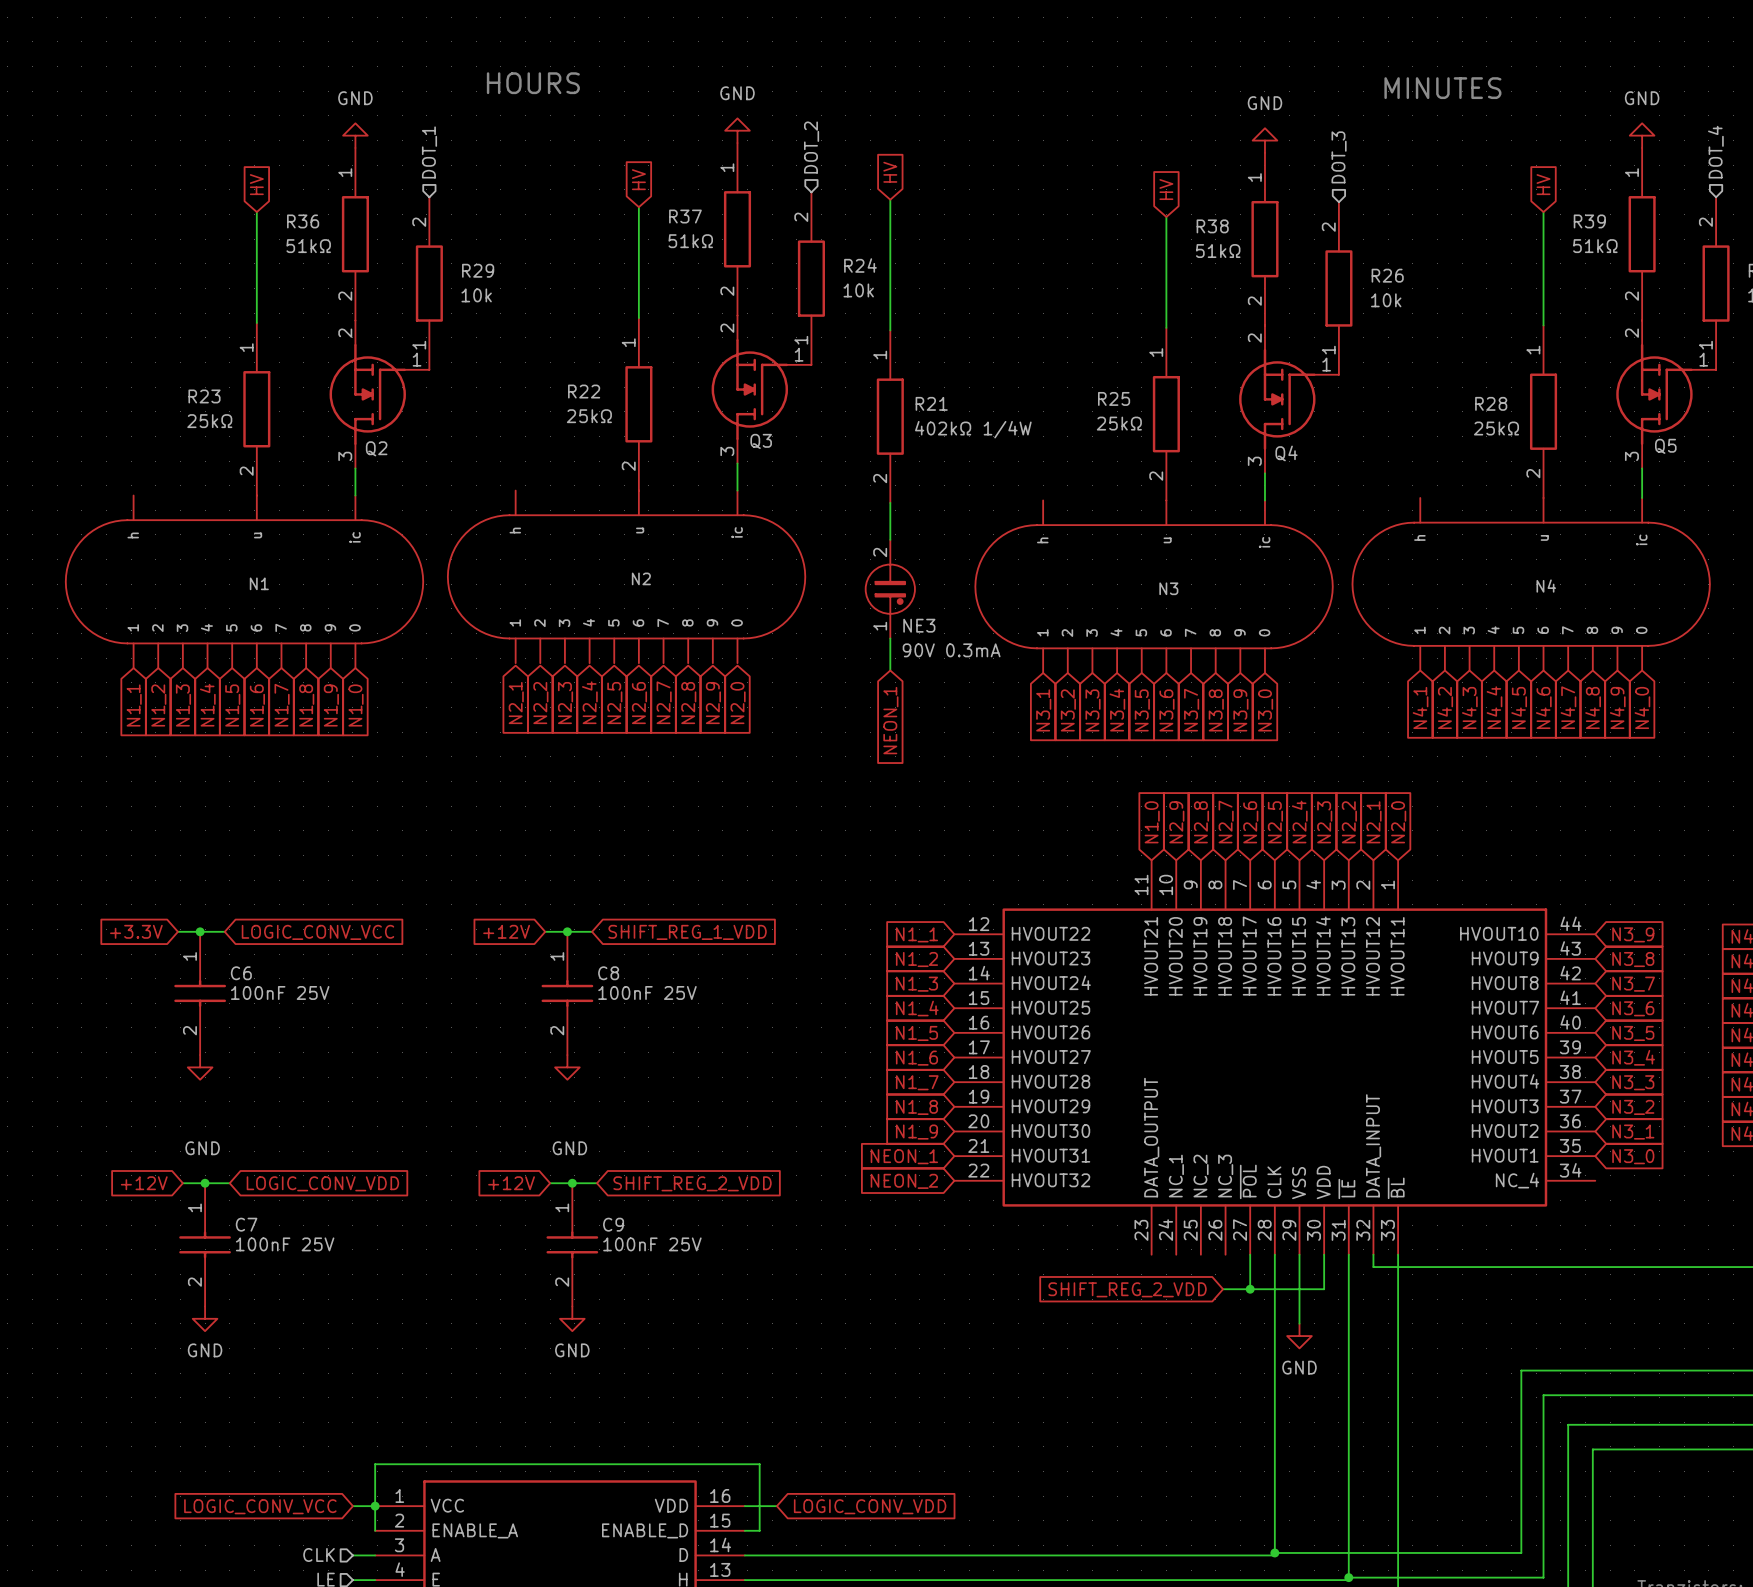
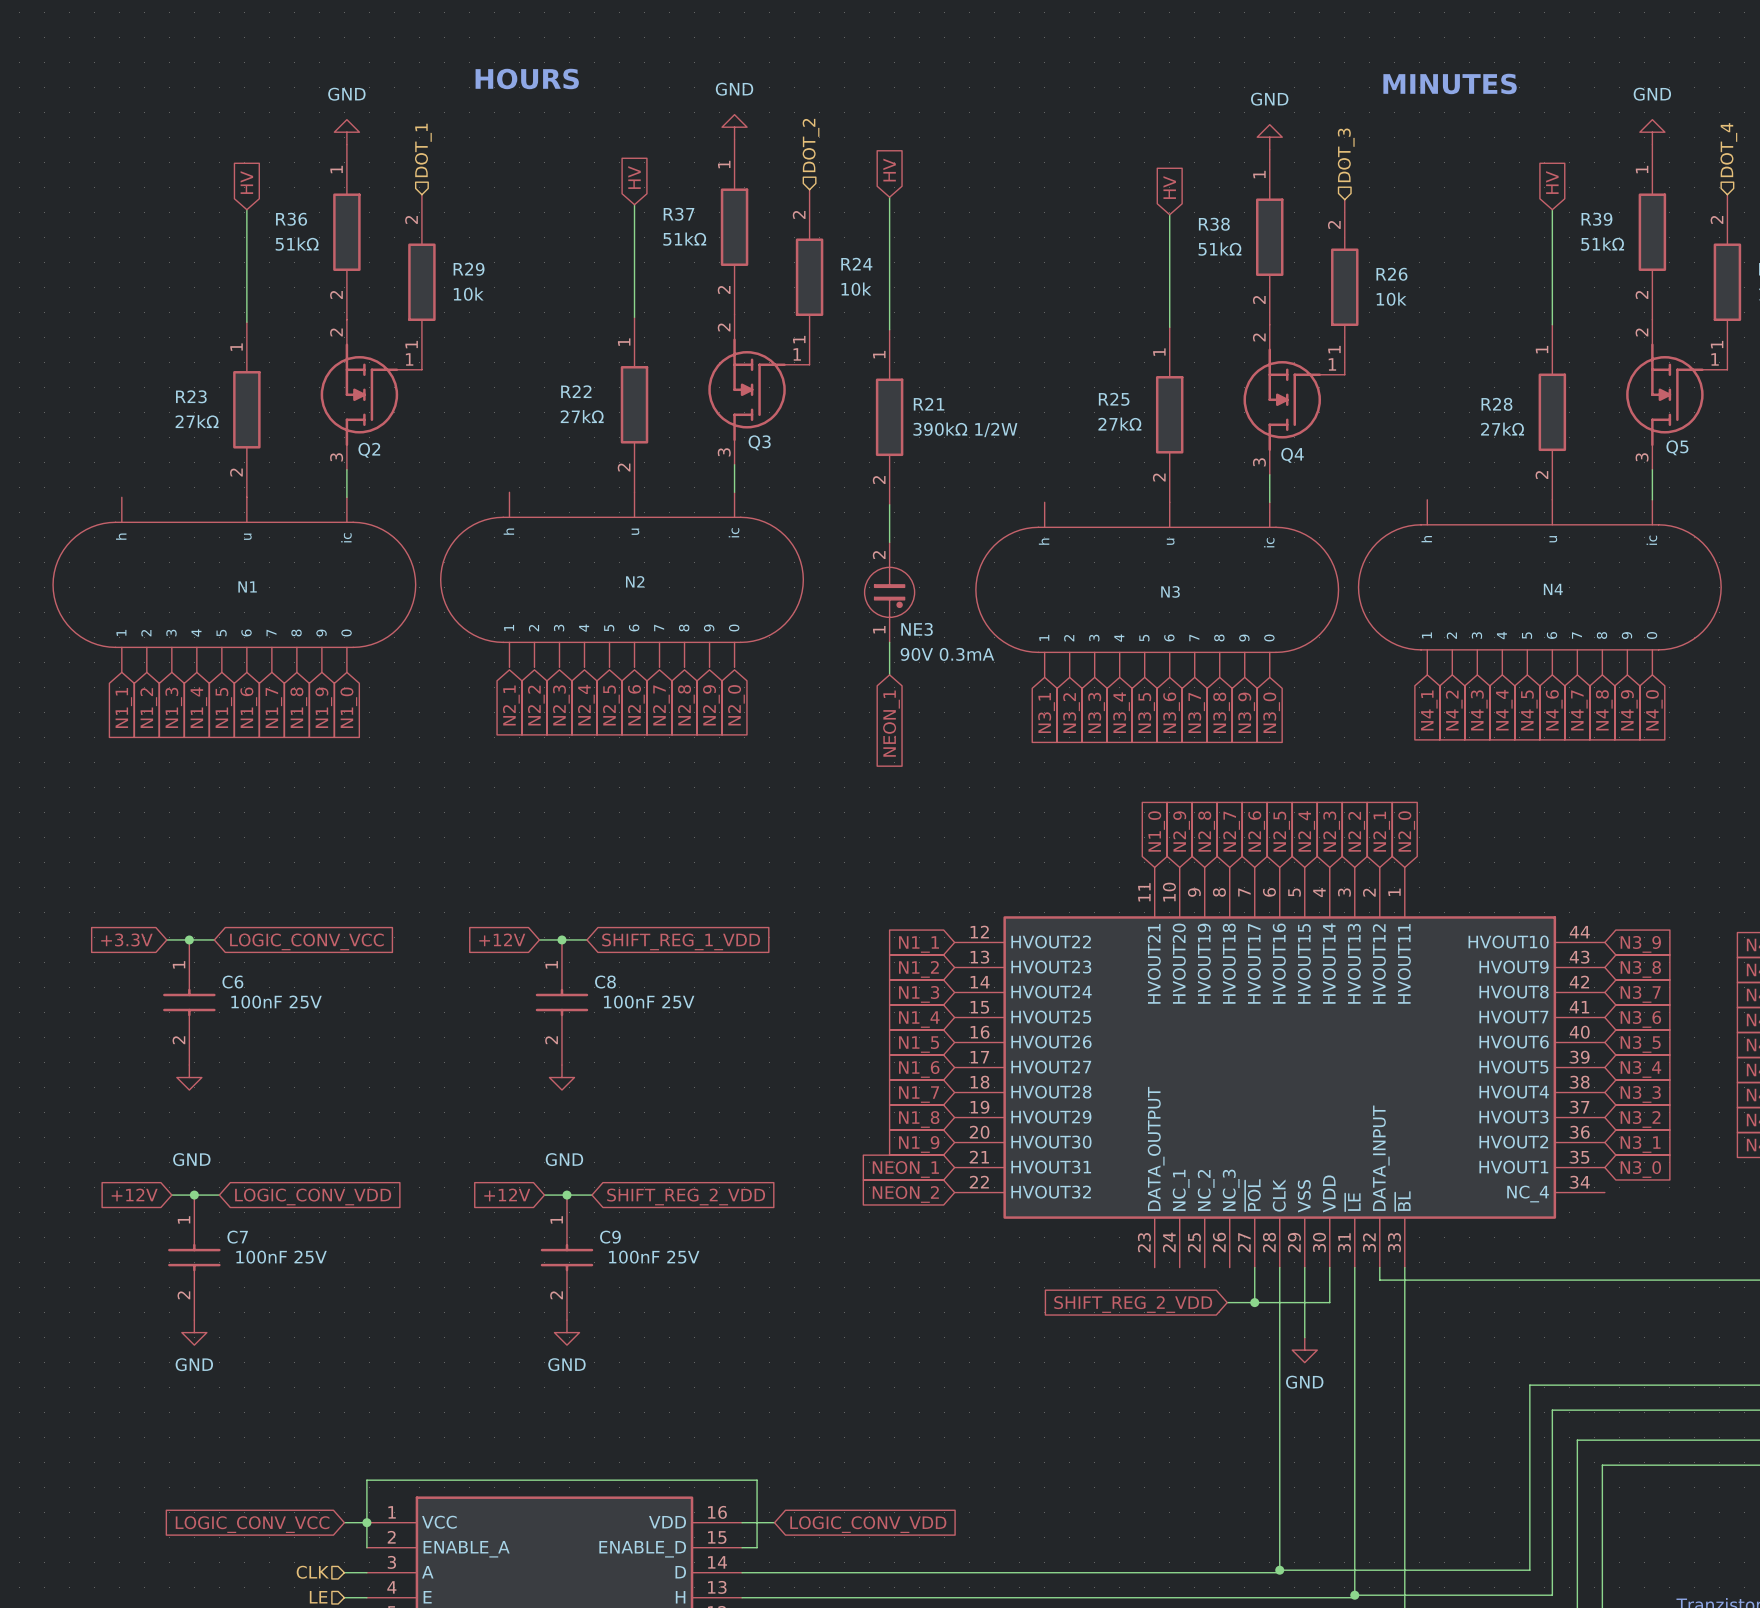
R22 value: 25kΩ (589, 416) -> 27kΩ (582, 416)
R23 value: 25kΩ (209, 421) -> 27kΩ (197, 421)
R25 value: 25kΩ (1119, 423) -> 27kΩ (1119, 424)
R28 value: 25kΩ (1496, 428) -> 27kΩ (1502, 429)
R21 value: 402kΩ 1/4W (973, 429) -> 390kΩ 1/2W (965, 429)

